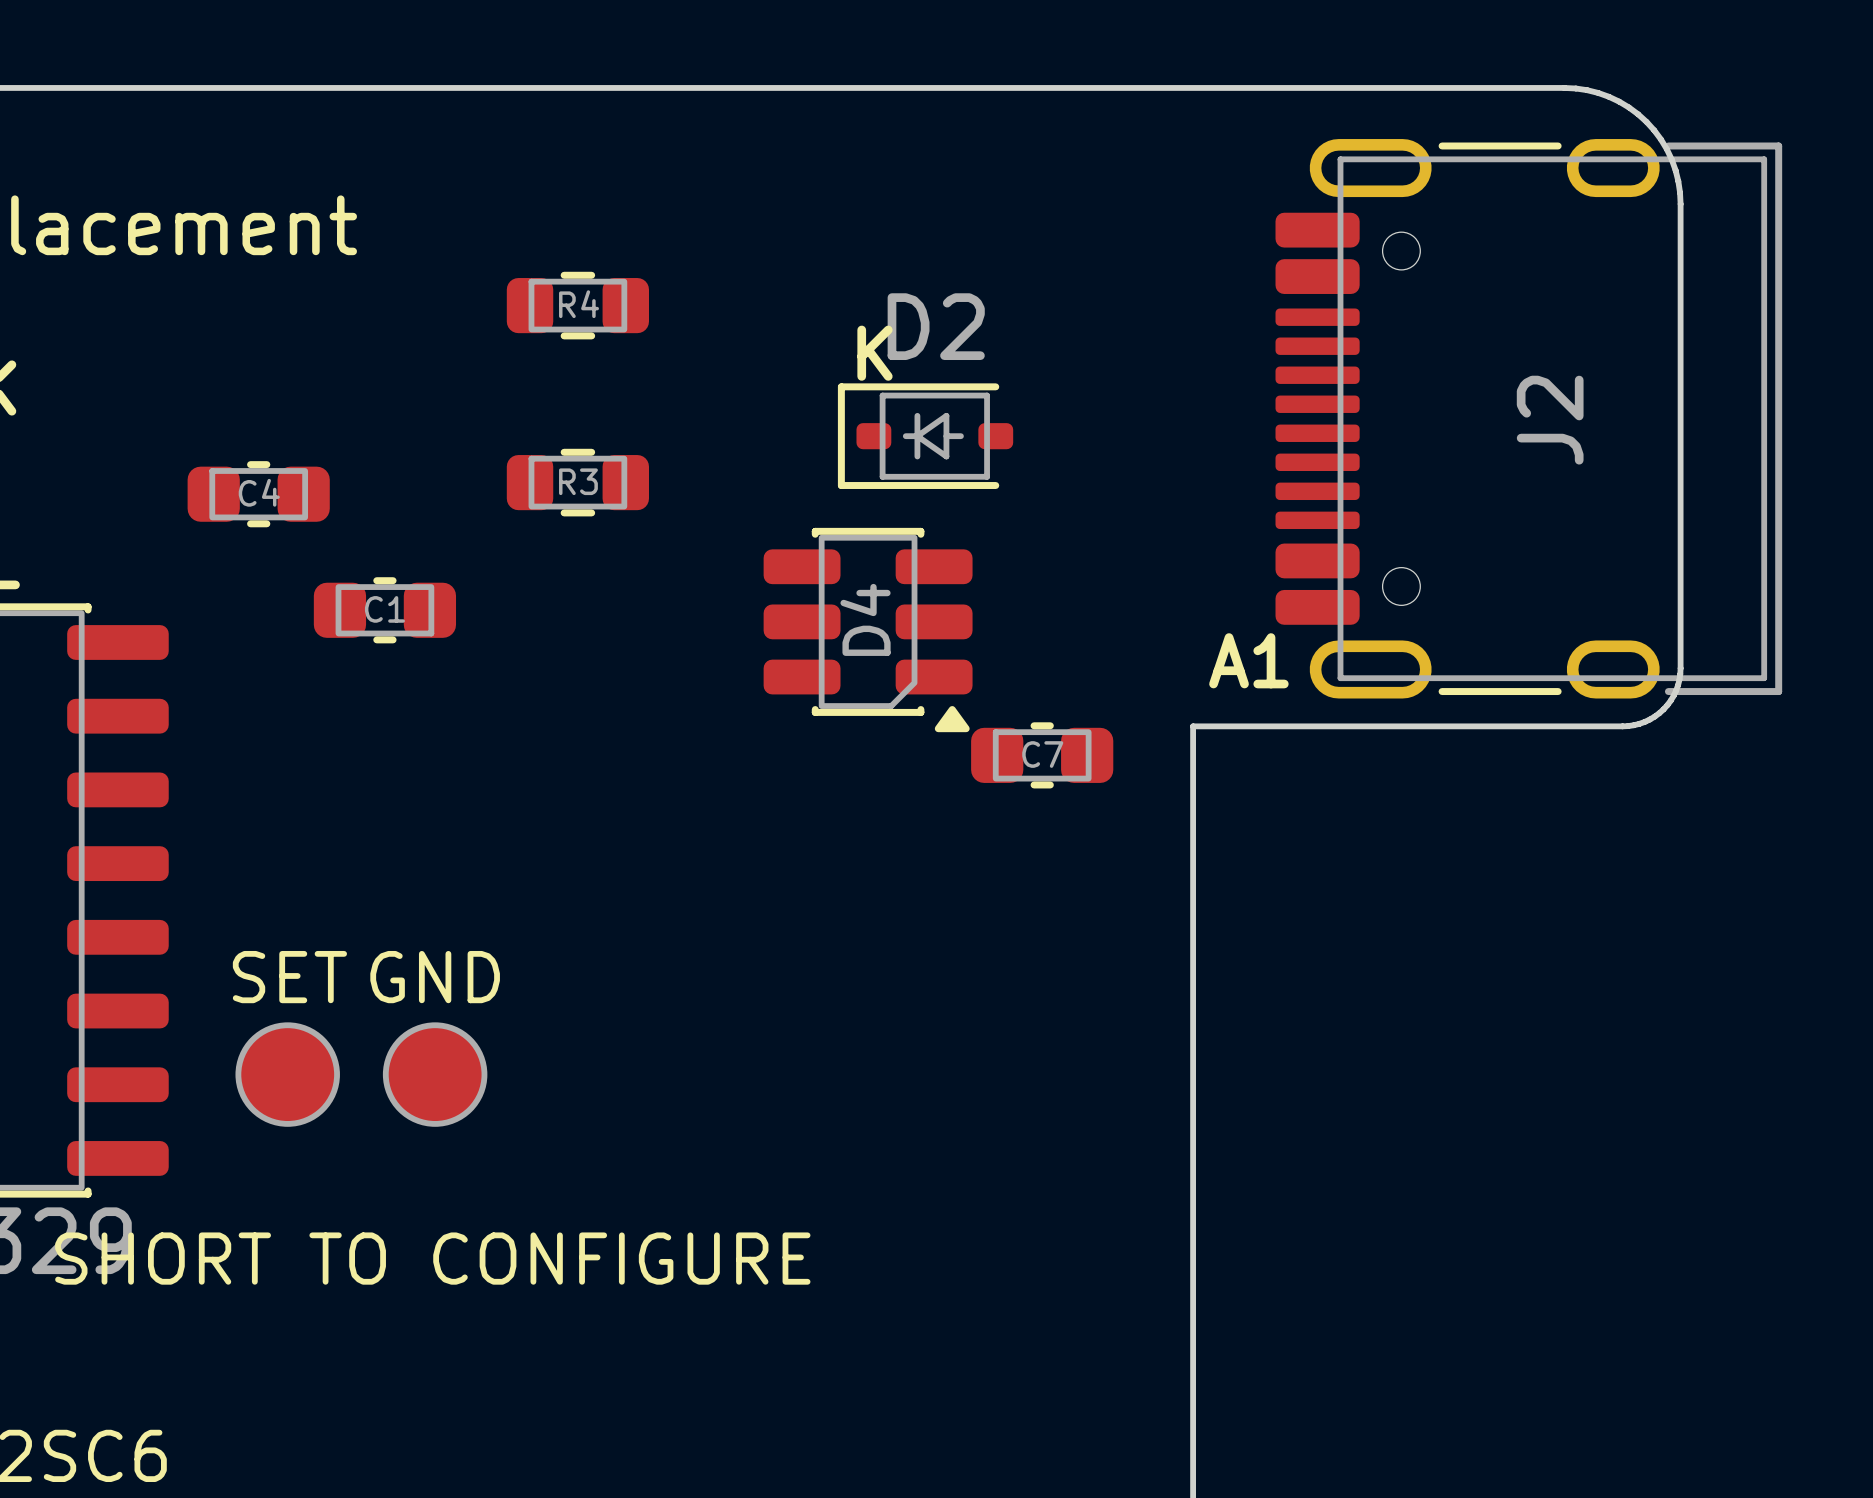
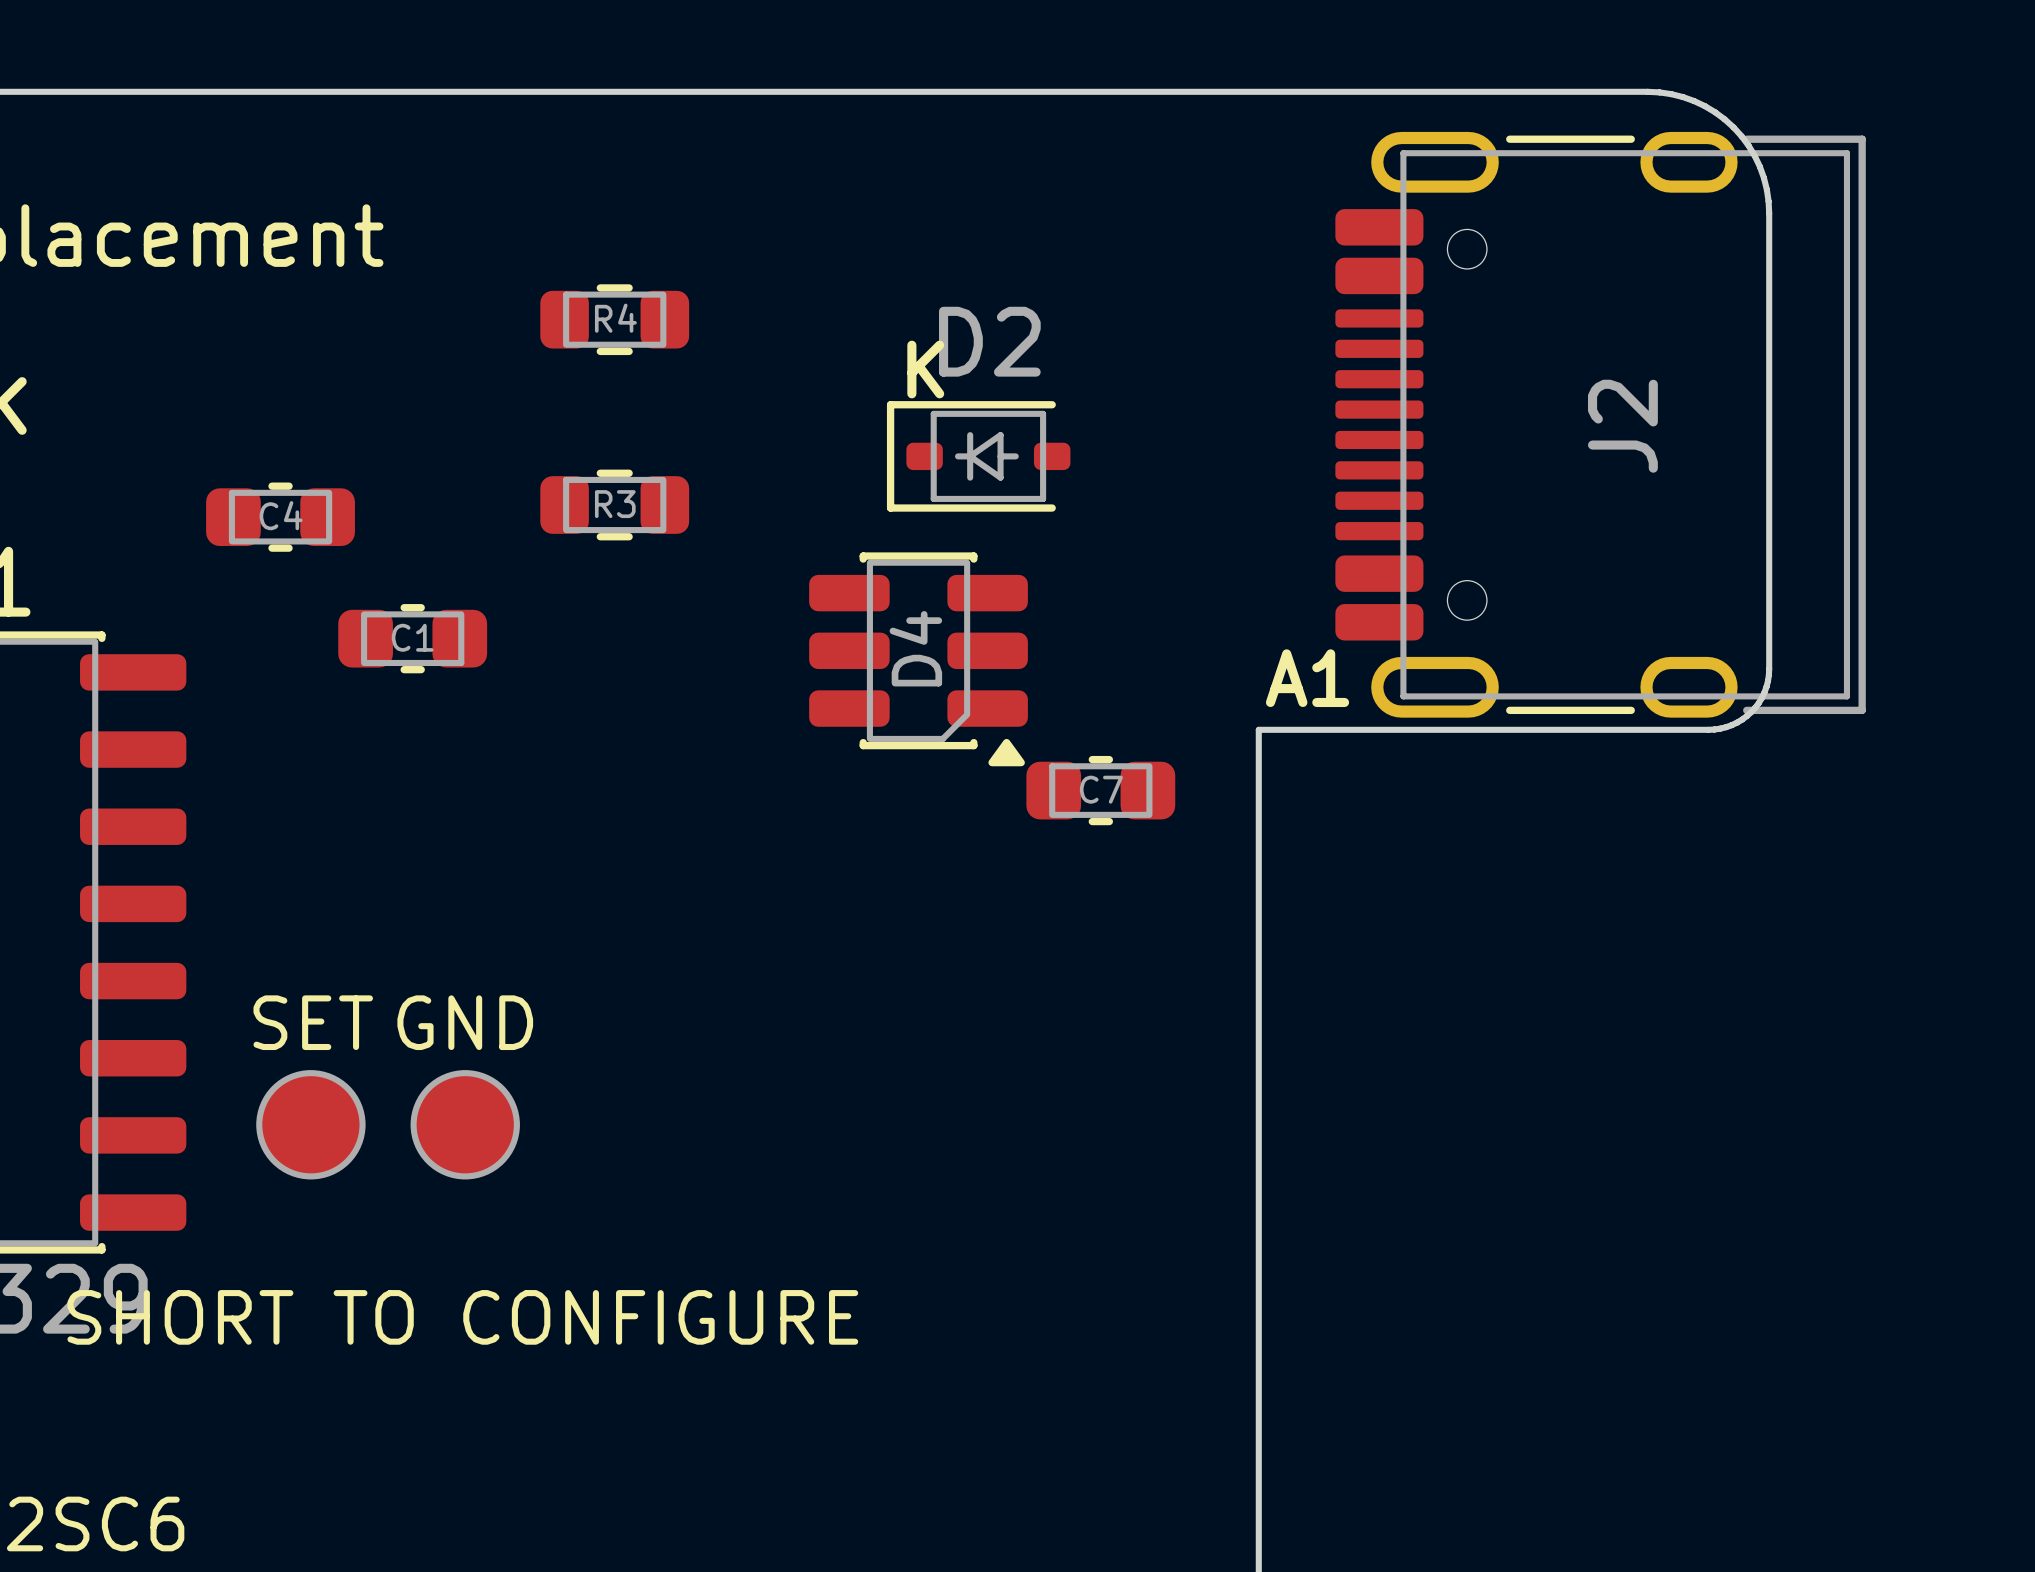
J2 position: (1528, 418) -> (1600, 424)
board edge: (1680, 639) (1680, 674) (1673, 695) (1659, 713) (1649, 719) (1633, 725) (1193, 726) -> (1769, 669) (1766, 686) (1755, 707) (1737, 722) (1720, 728) (1258, 729) (1258, 760)
text position: A1 (1248, 660) -> A1 (1307, 678)

